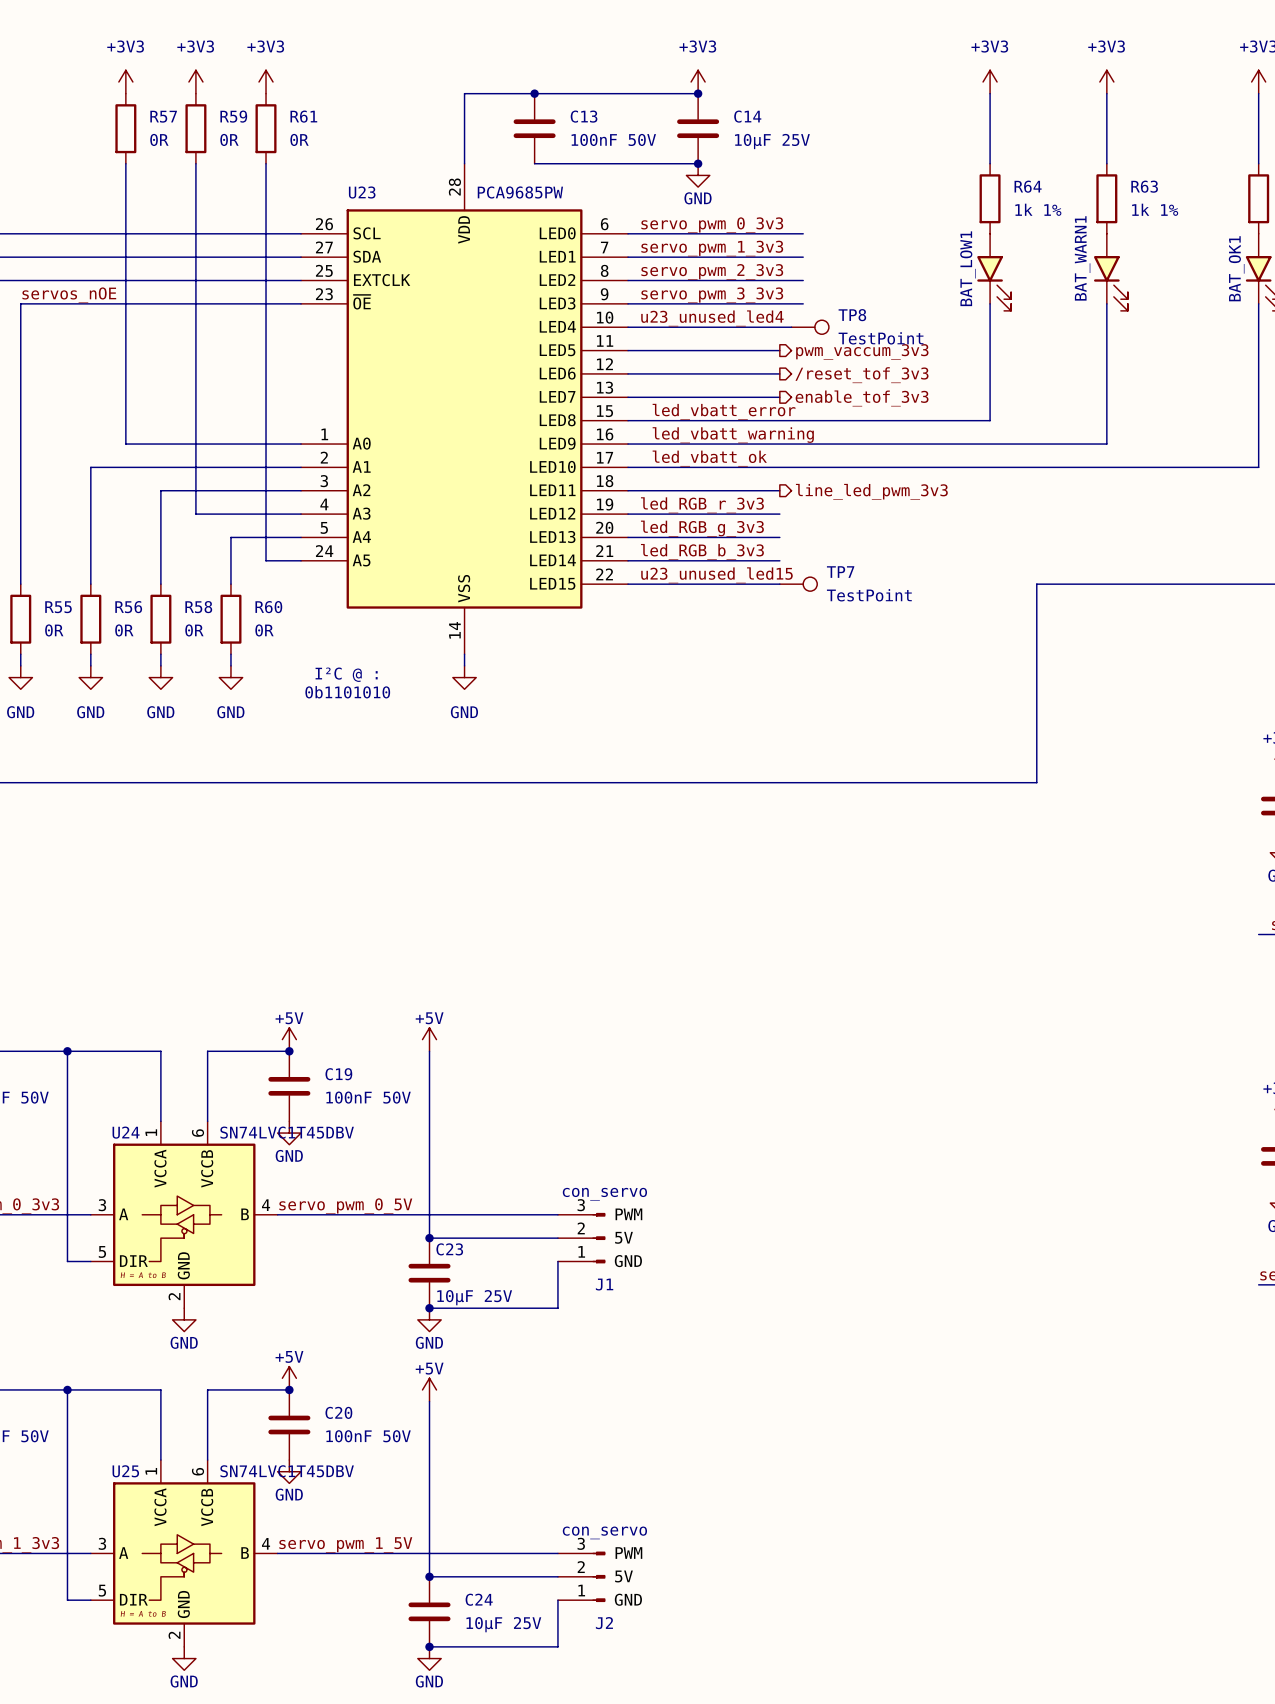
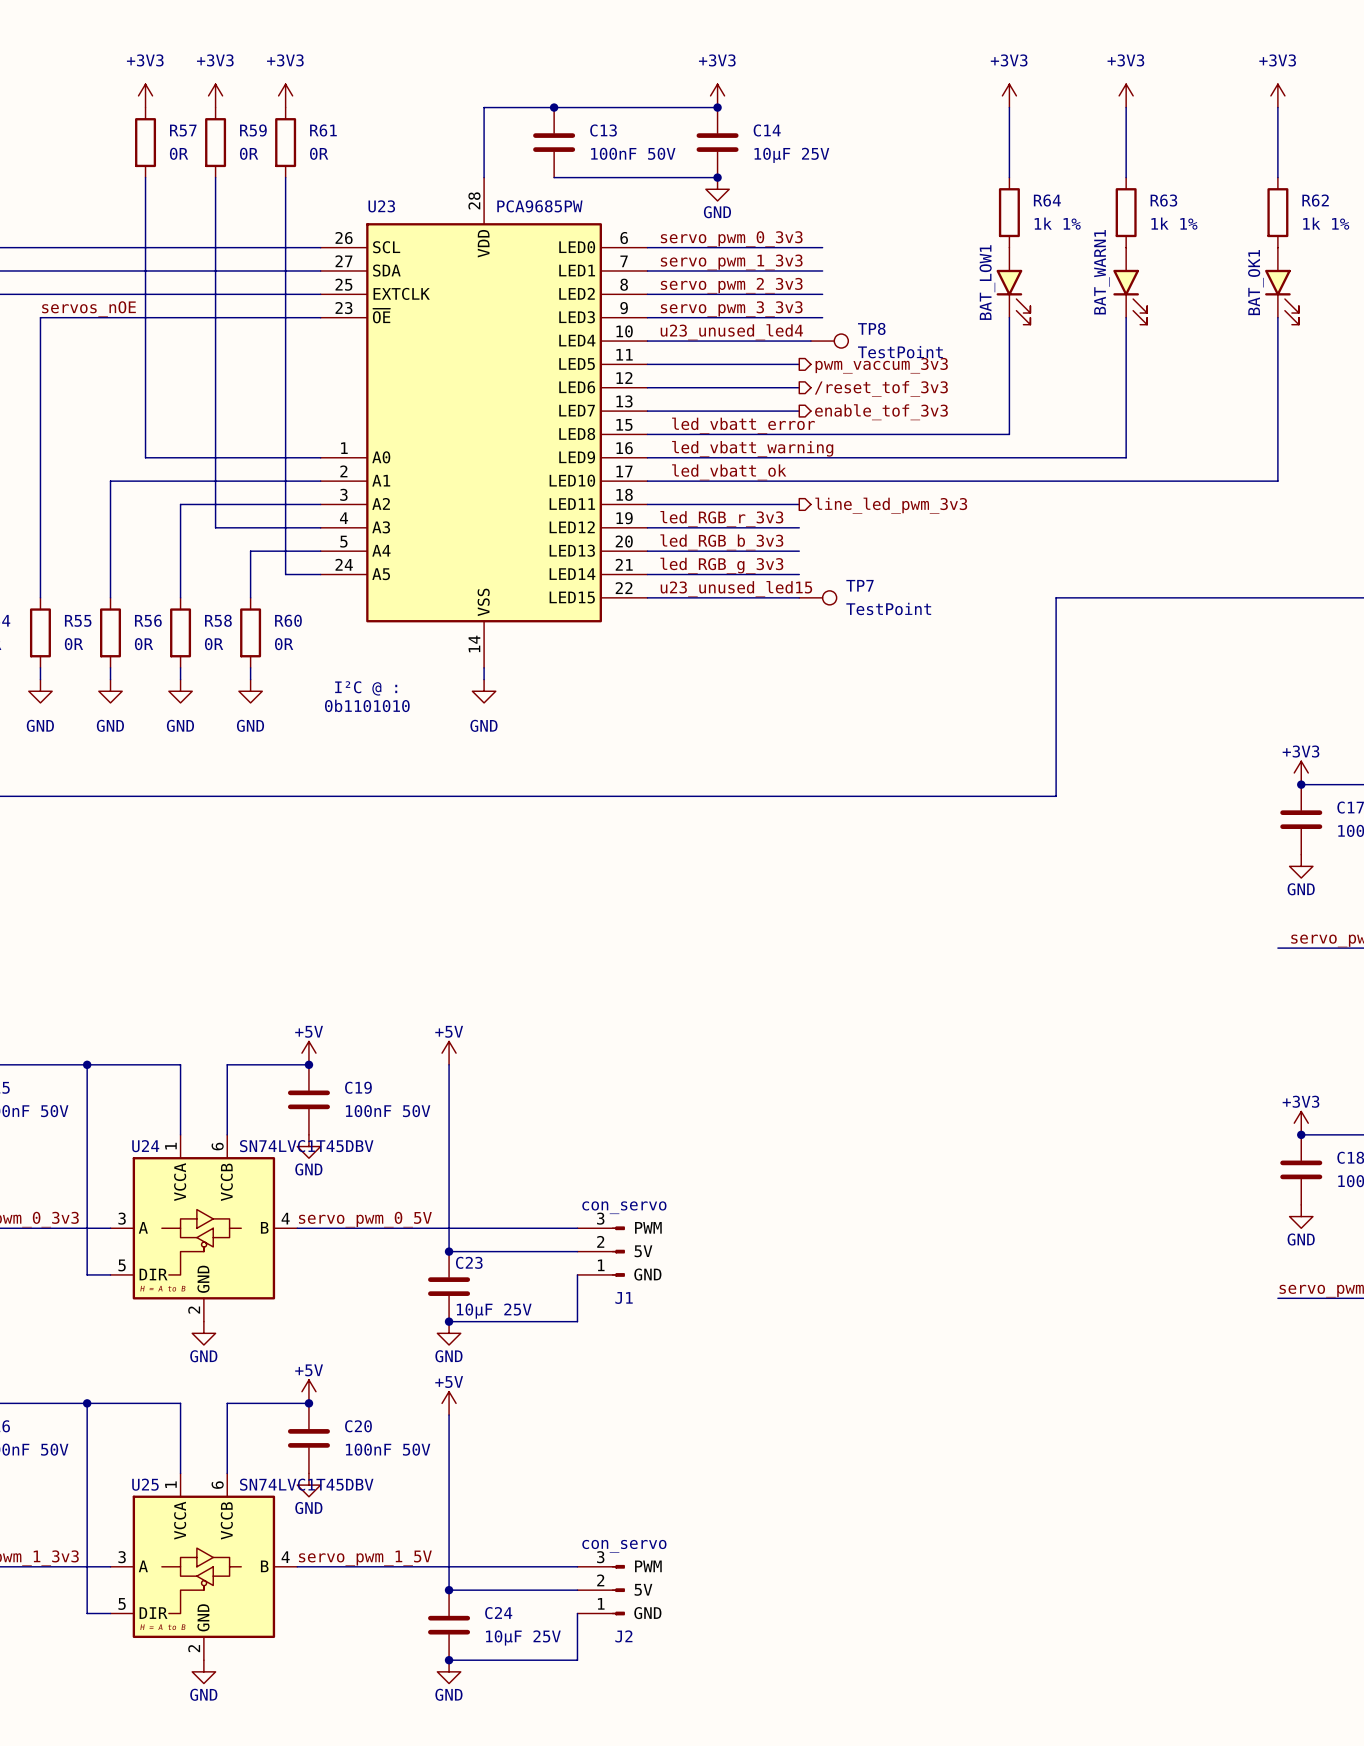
label: led_RGB_g_3v3 (702, 528) -> led_RGB_b_3v3 (721, 542)
label: led_RGB_b_3v3 (702, 551) -> led_RGB_g_3v3 (721, 565)

